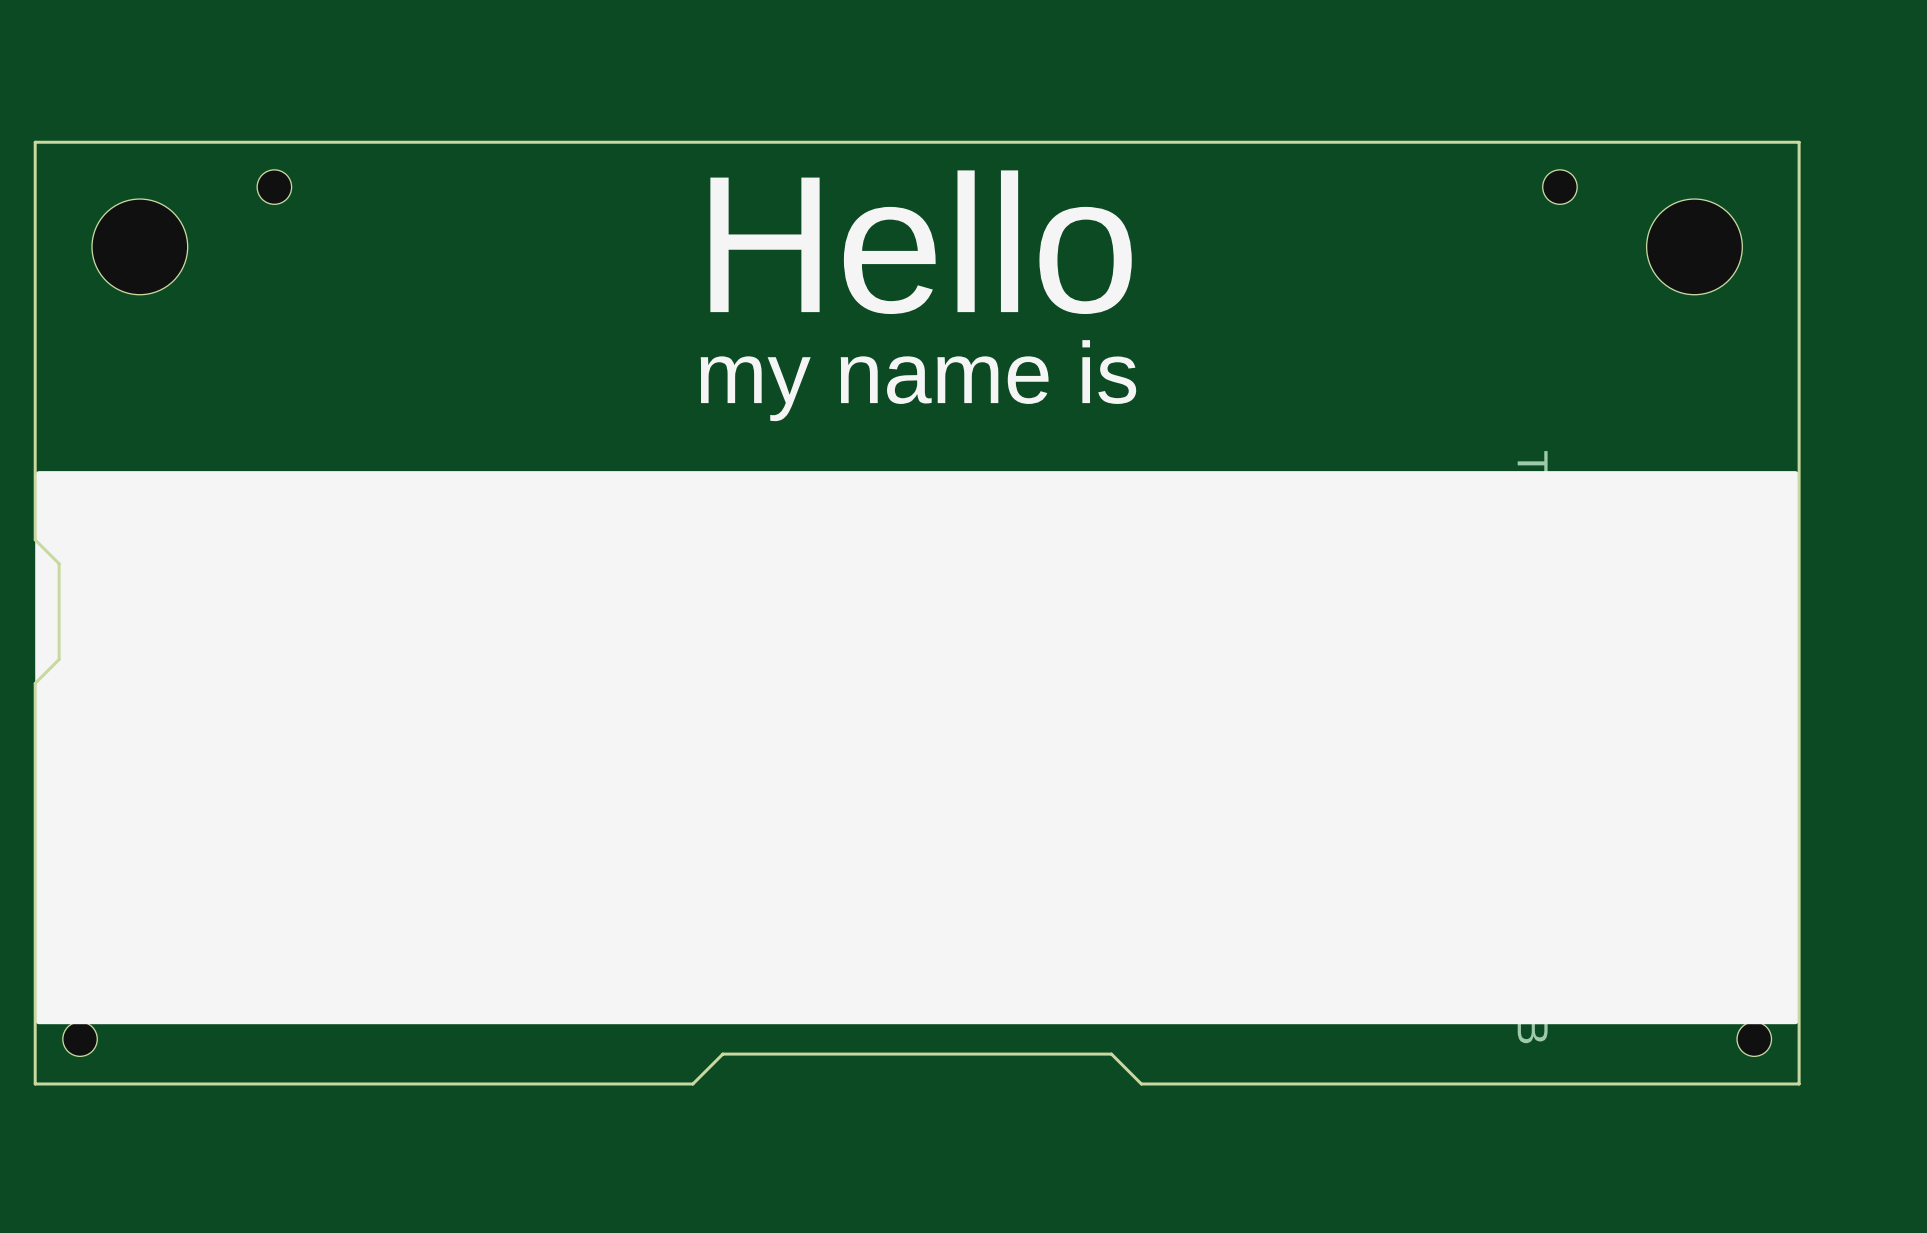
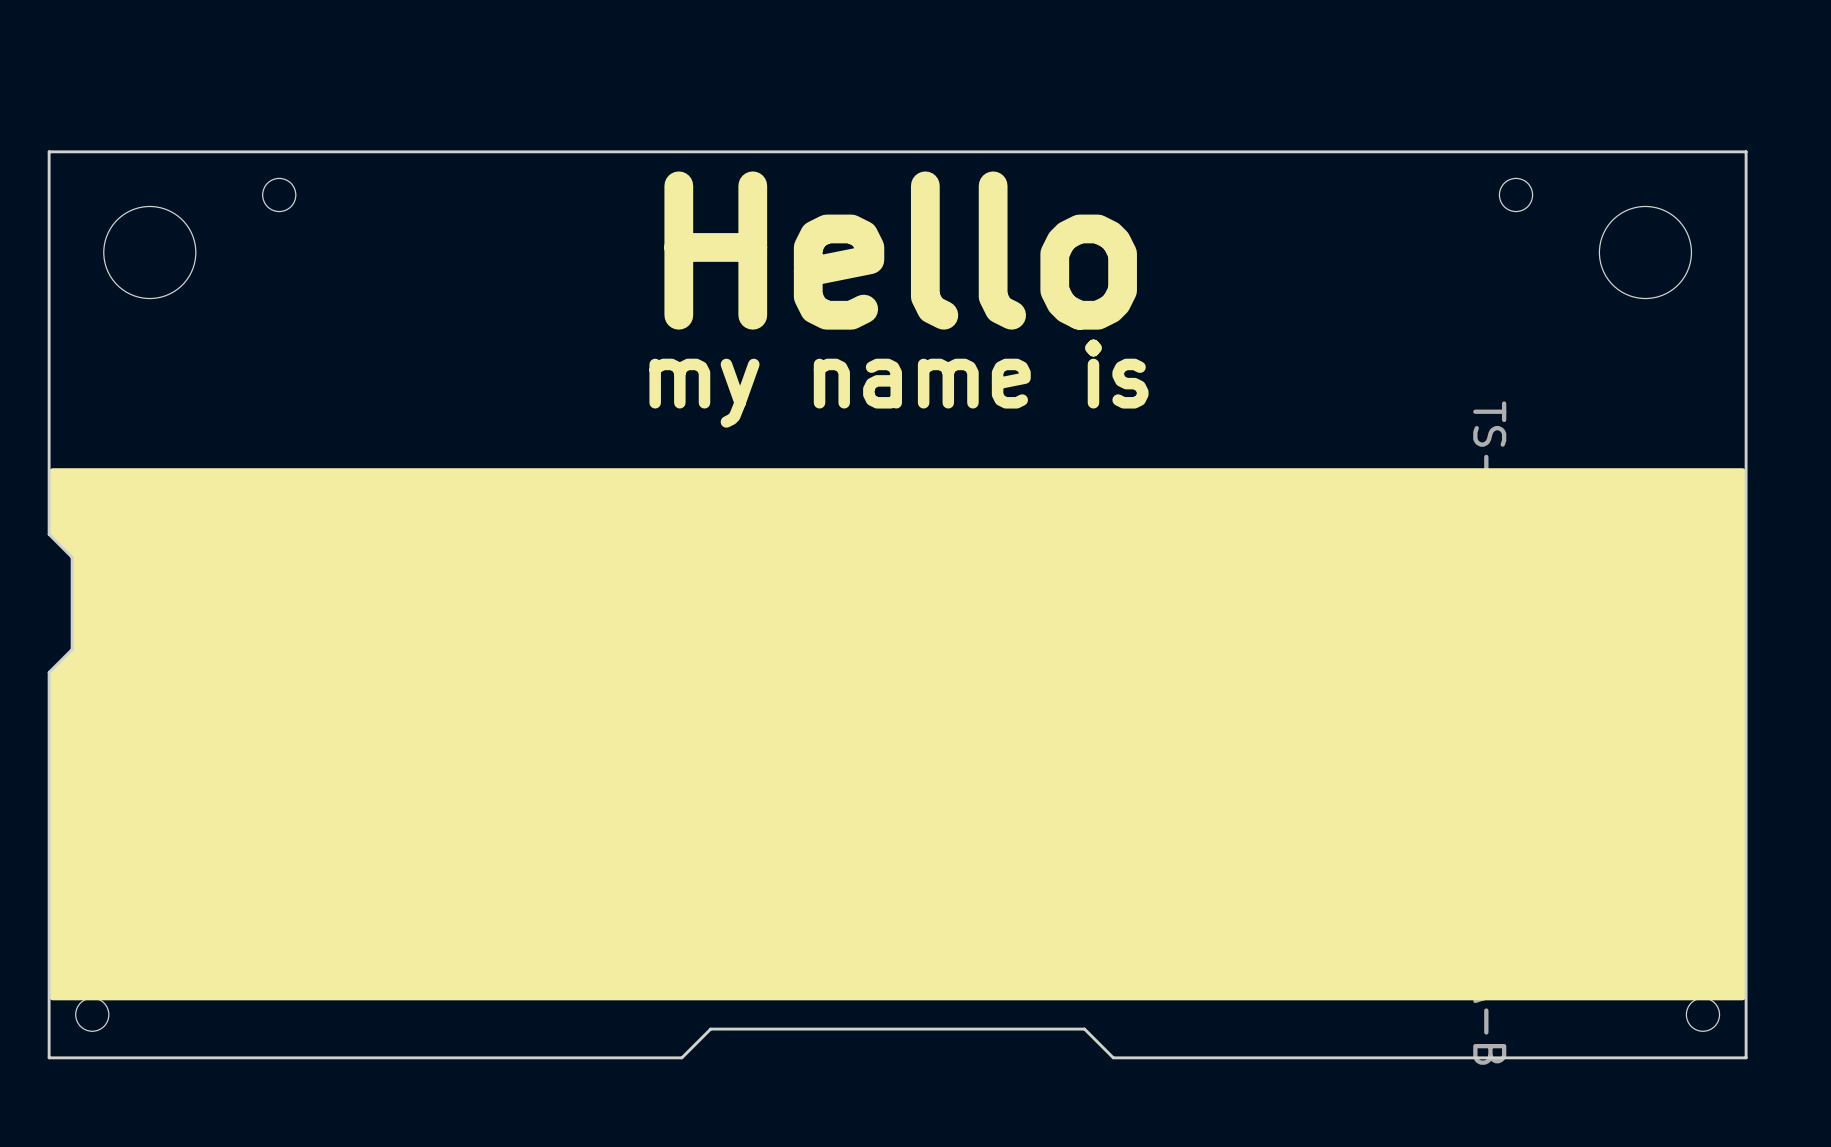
drawing shape: [35, 471, 1800, 1025] -> [49, 468, 1747, 1001]

